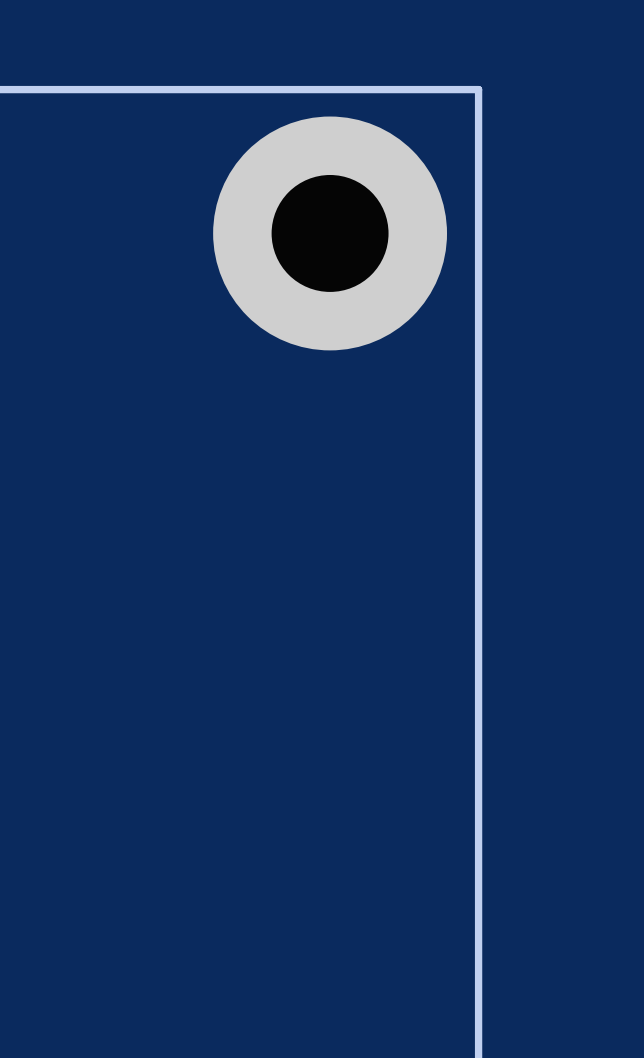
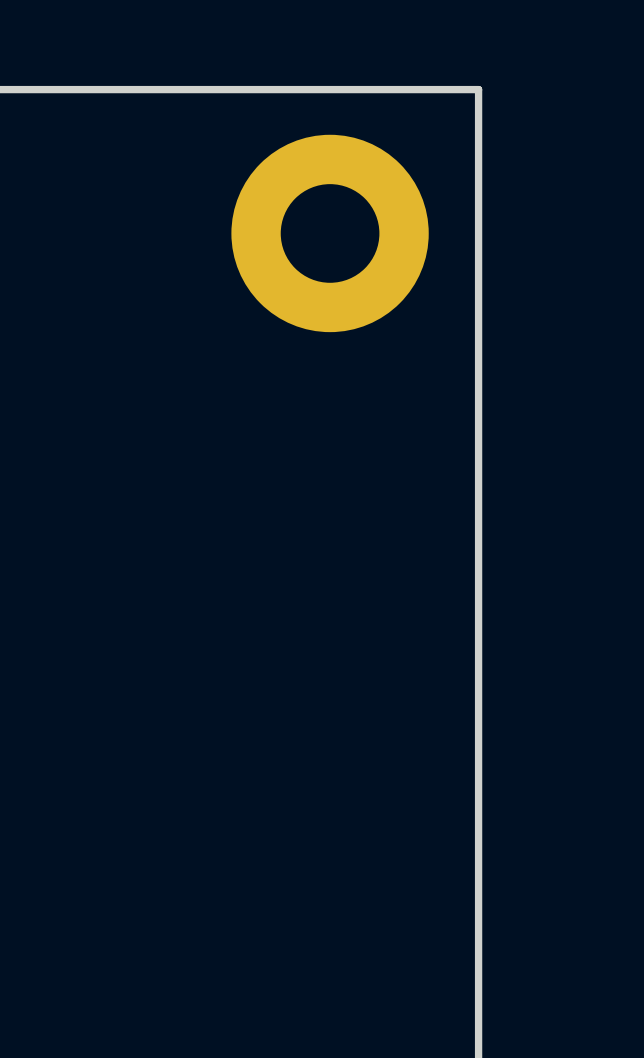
part footprint: [213, 116, 448, 351] -> [231, 134, 429, 333]

